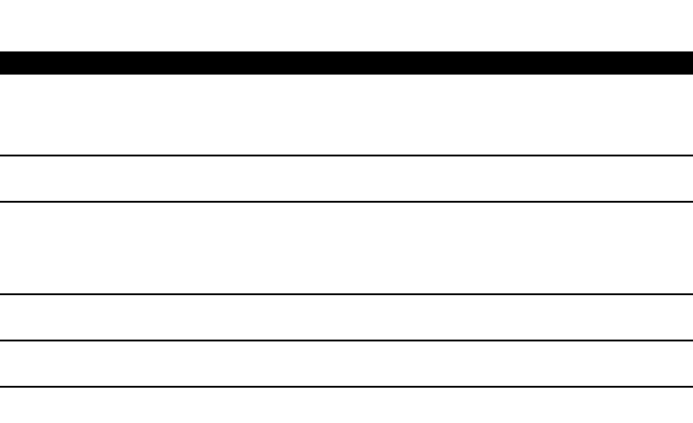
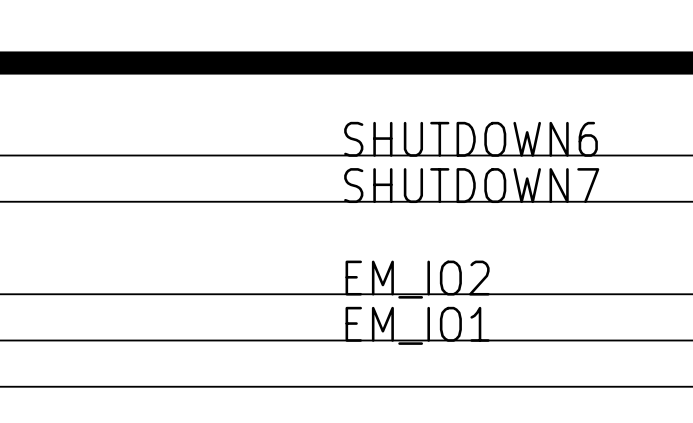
label: none -> SHUTDOWN6 (471, 139)
label: none -> SHUTDOWN7 (471, 185)
label: none -> EM_IO2 (417, 279)
label: none -> EM_IO1 (417, 325)

